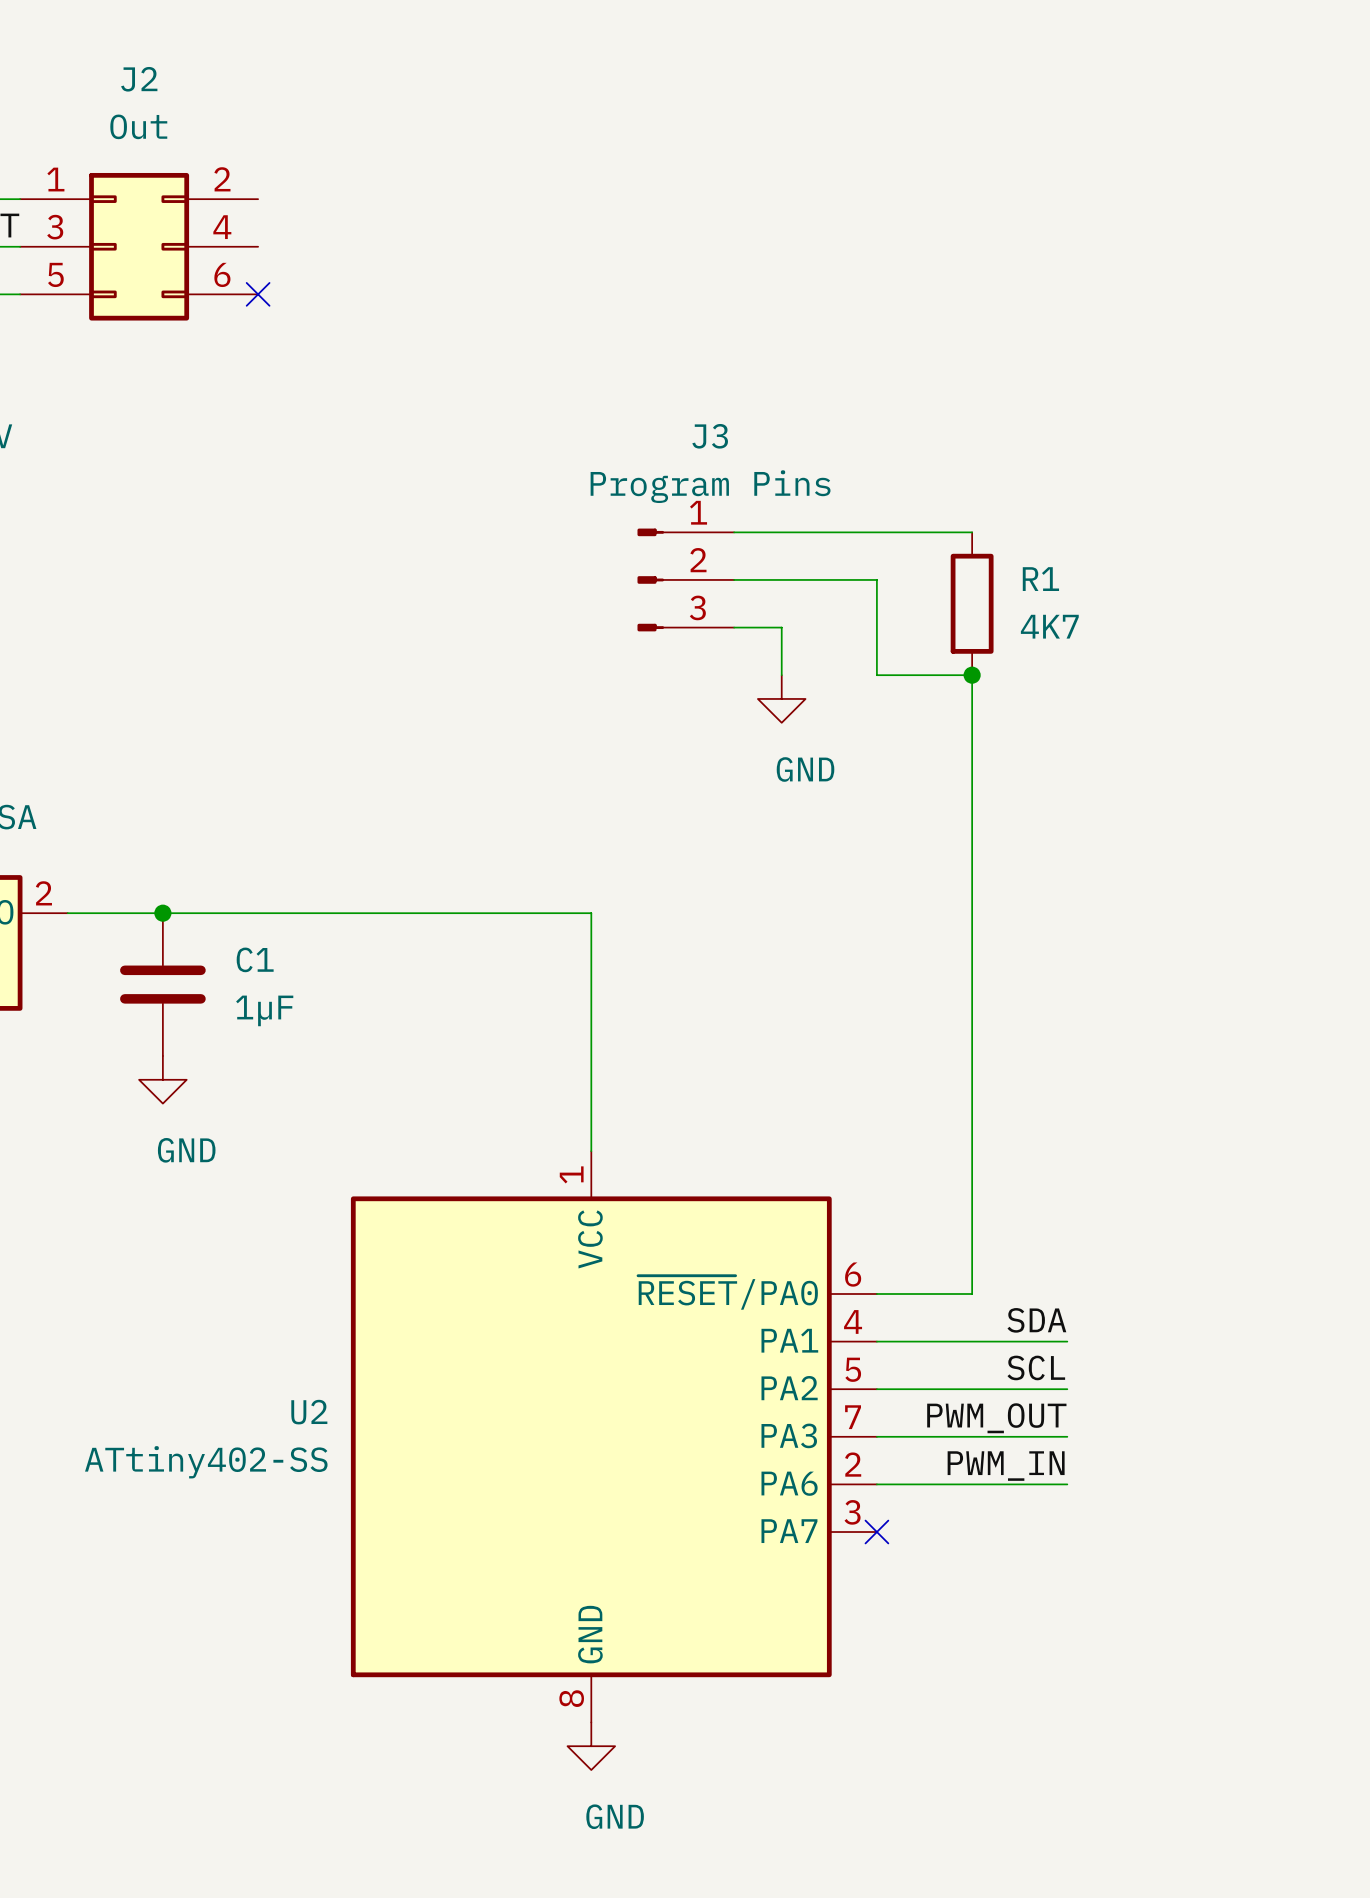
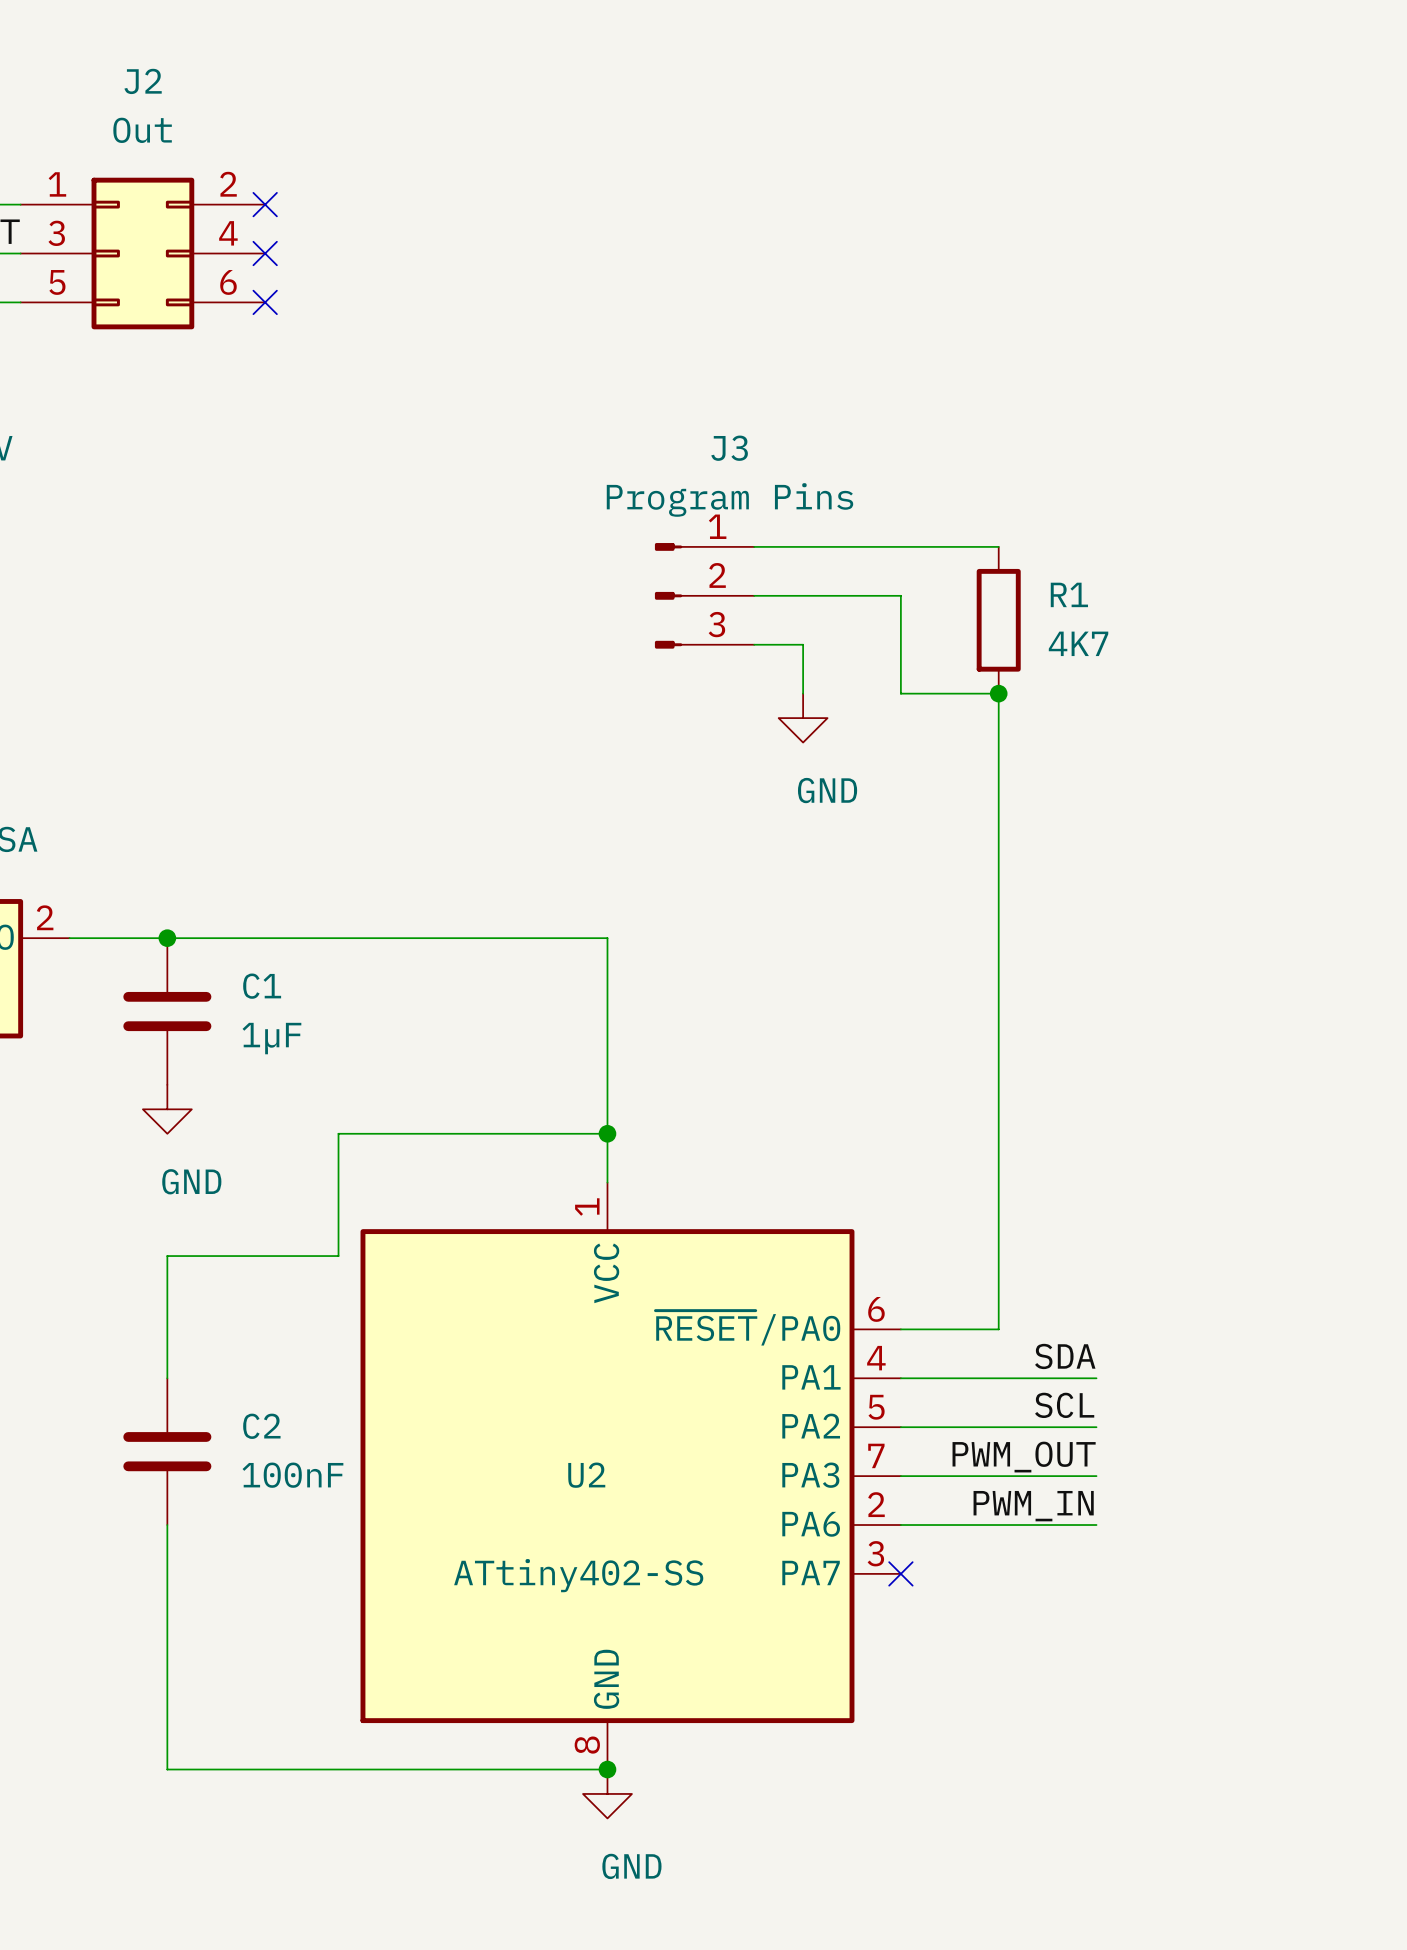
no-connect mark: none -> (265, 204)
no-connect mark: none -> (265, 253)
wire: none -> (607, 1133) (338, 1133) (338, 1256) (167, 1256) (167, 1378)
junction: none -> (607, 1133)
U2 name position: U2 (309, 1412) -> U2 (586, 1475)
C2: none -> 100nF (167, 1451)
U2 value position: ATtiny402-SS (206, 1462) -> ATtiny402-SS (578, 1575)
wire: none -> (167, 1525) (167, 1769) (607, 1769)
junction: none -> (607, 1769)

